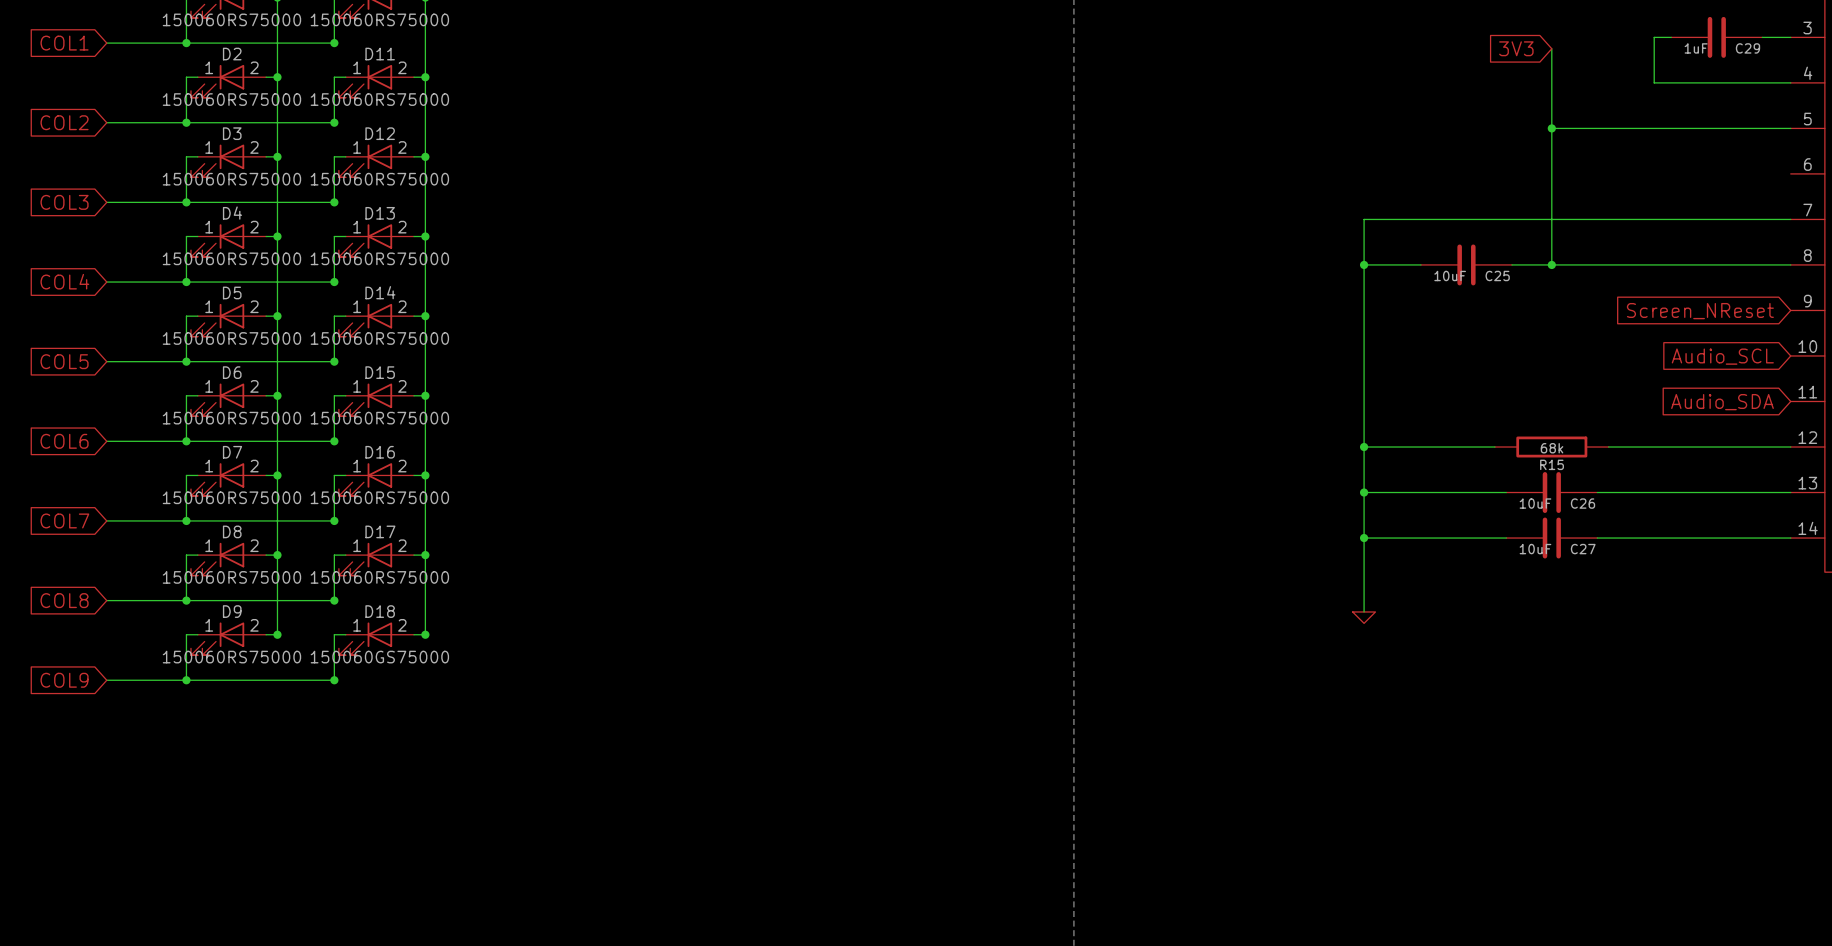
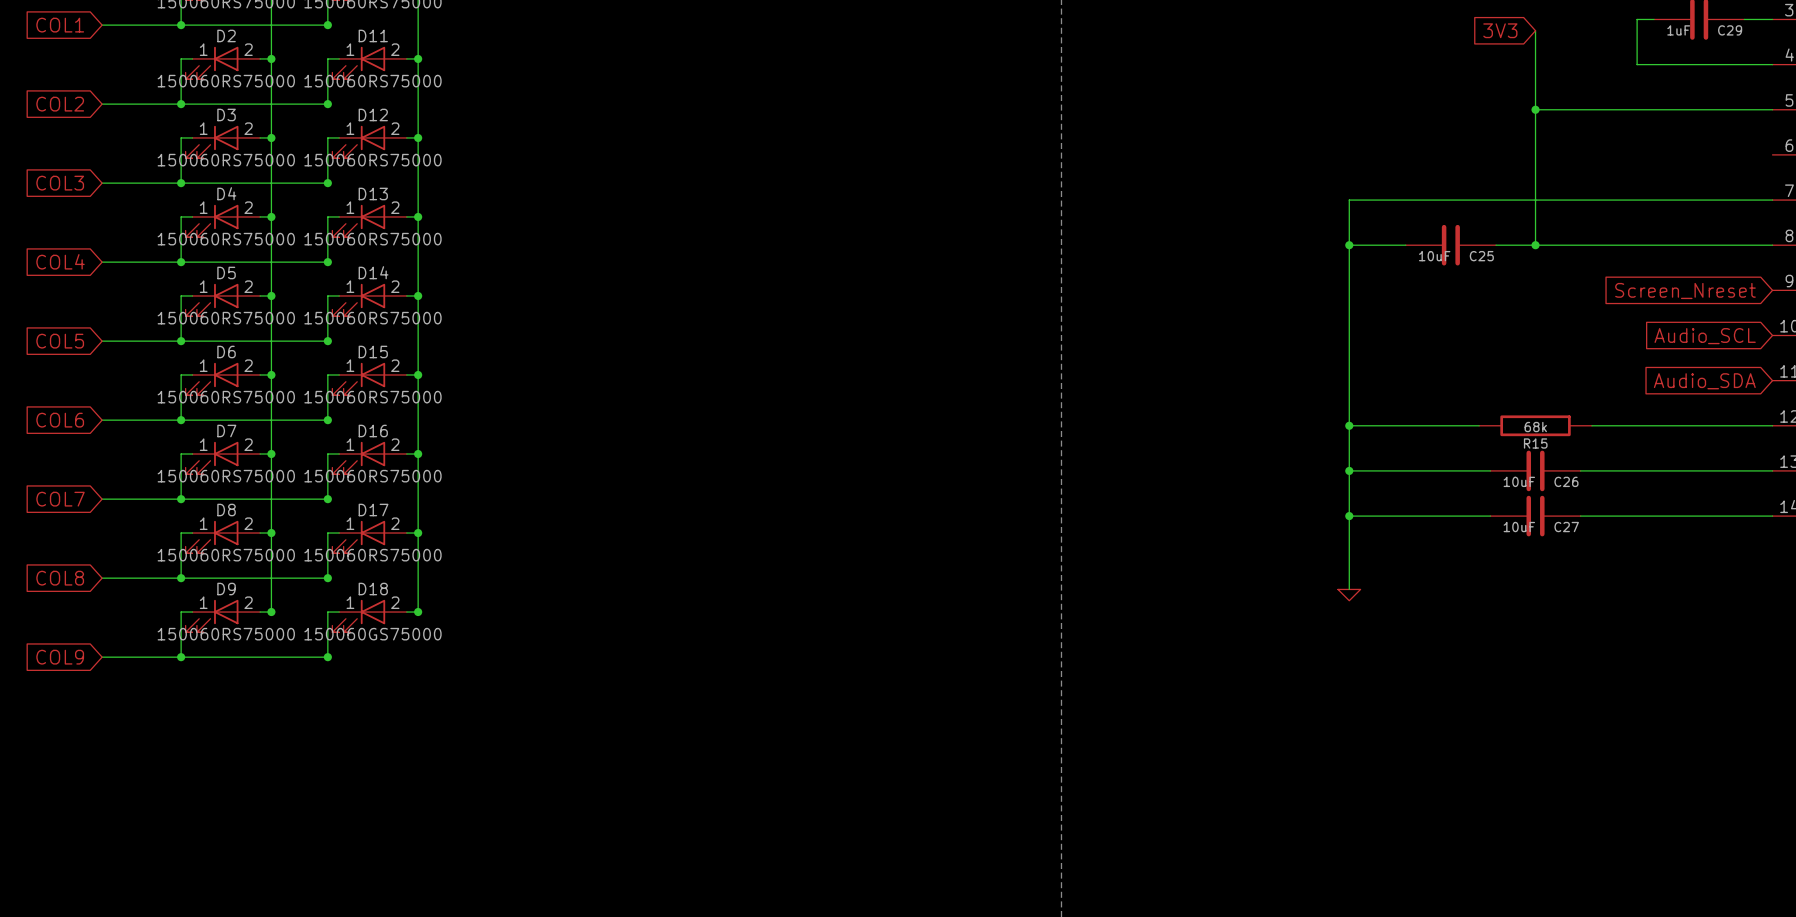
global label: Screen_NReset (1700, 311) -> Screen_Nreset (1685, 290)

